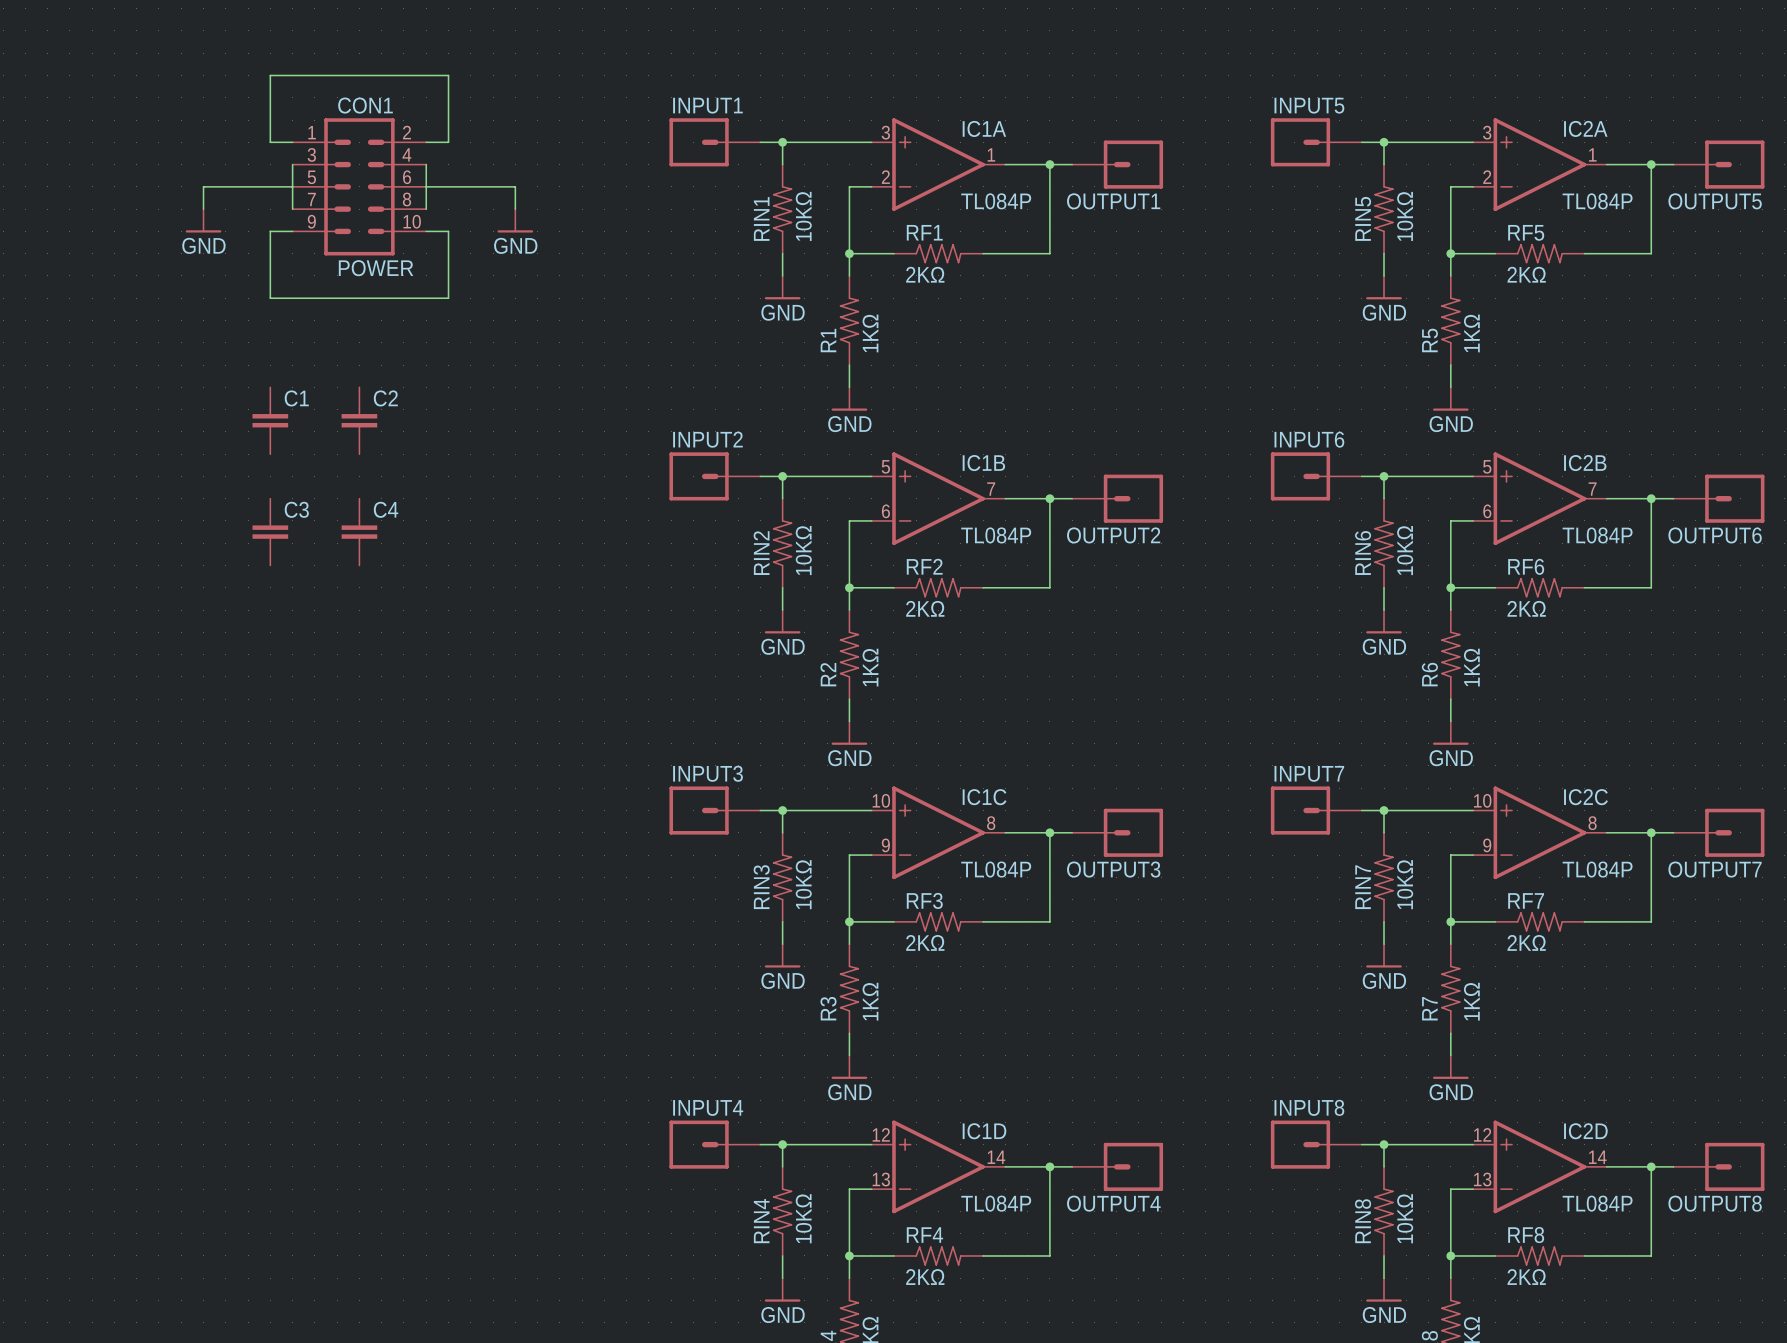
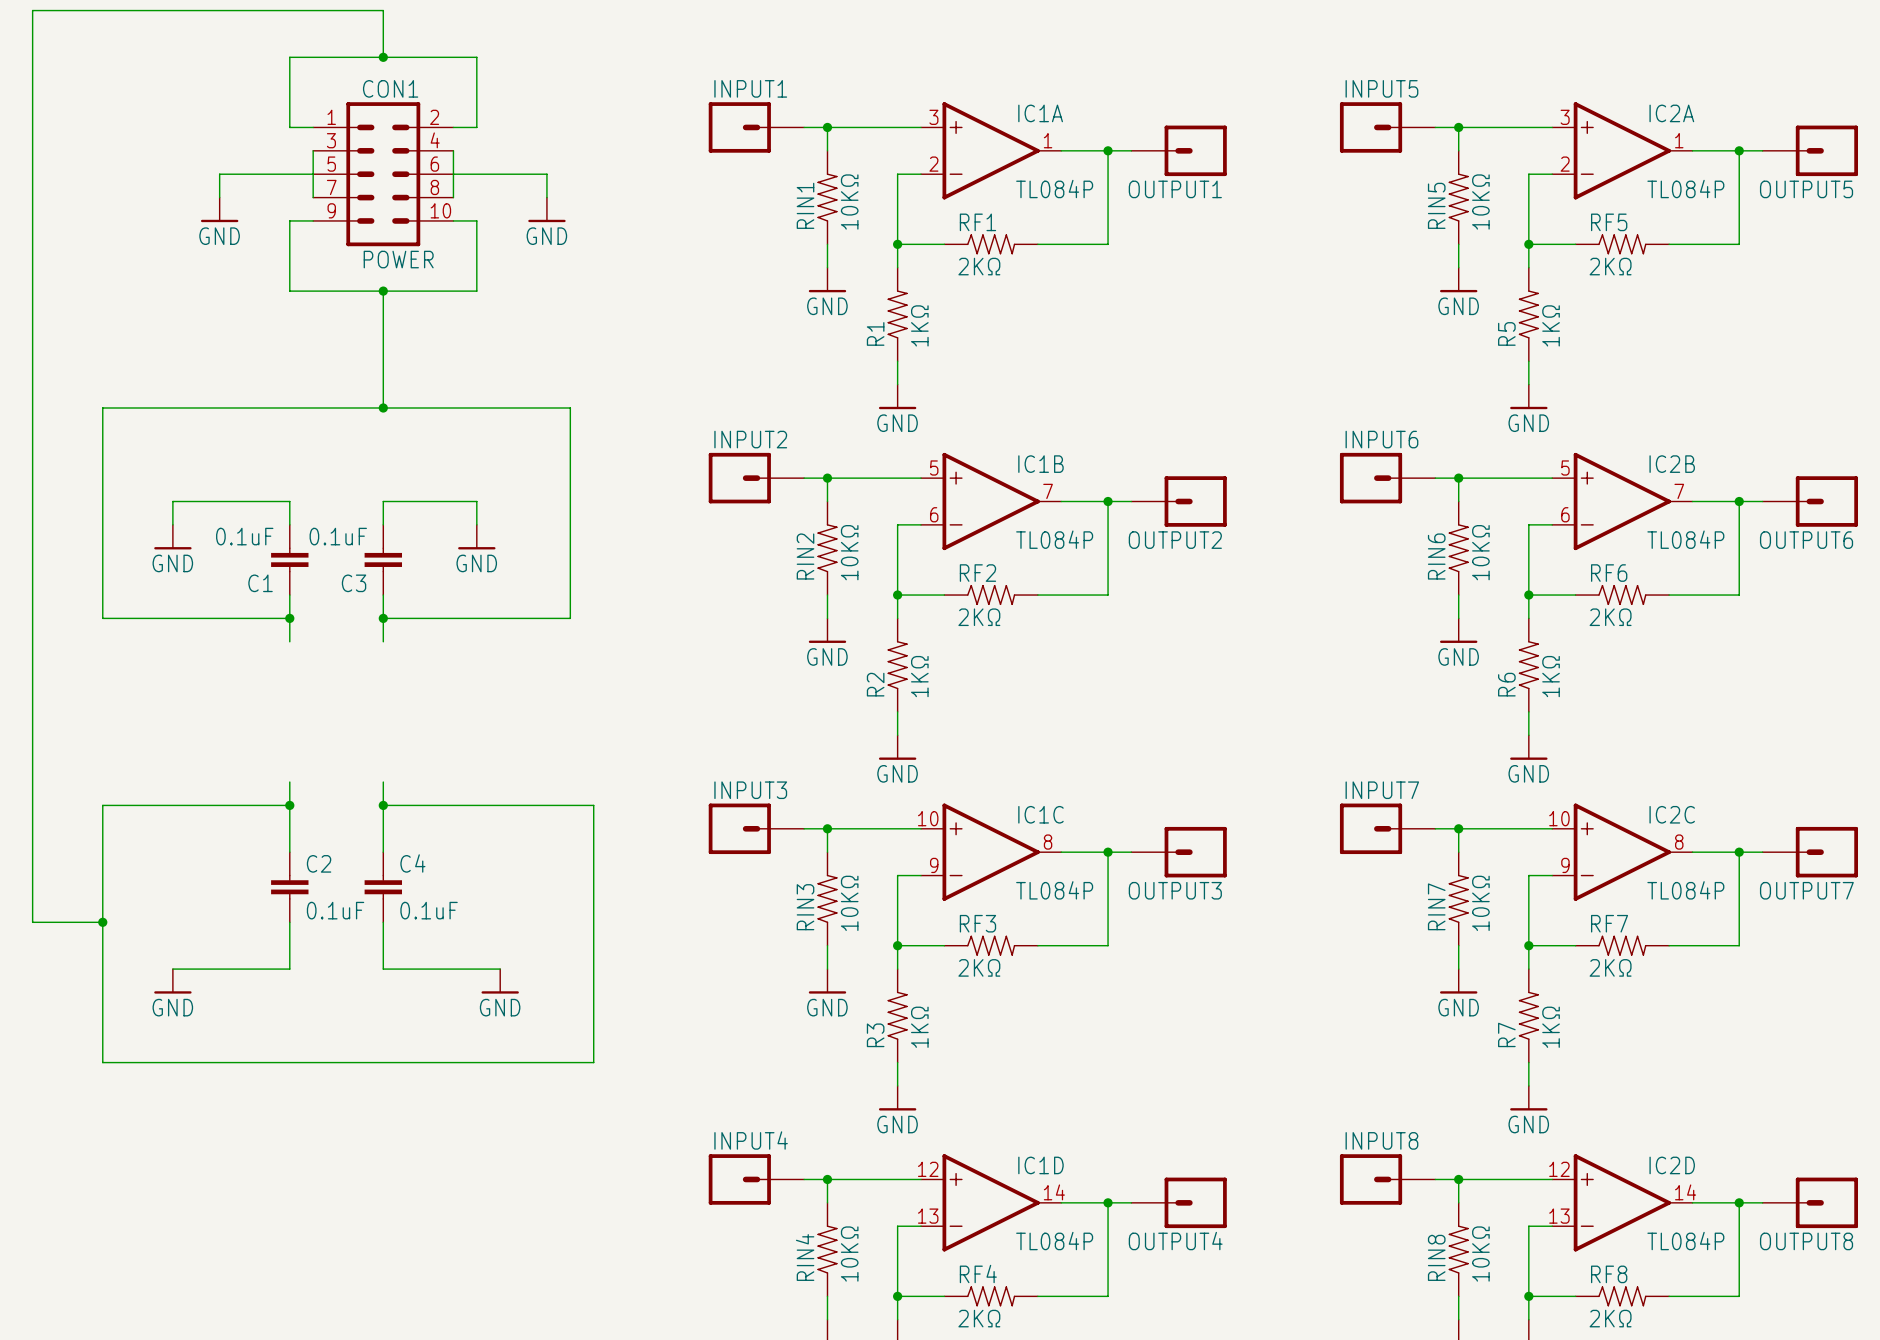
wire: none -> (383, 57) (383, 10) (32, 10) (32, 922) (102, 922)
junction: none -> (383, 57)
wire: none -> (383, 291) (383, 407)
junction: none -> (383, 291)
C1 name position: C1 (296, 398) -> C1 (260, 583)
junction: none -> (383, 407)
C1 position: (270, 420) -> (289, 559)
C2 position: (359, 420) -> (289, 887)
C3 name position: C3 (296, 509) -> C3 (354, 583)
wire: none -> (172, 524) (172, 501) (289, 501) (289, 524)
wire: none -> (383, 524) (383, 501) (476, 501) (476, 524)
power symbol: none -> GND (172, 537)
C1 value: none -> 0.1uF (244, 536)
C3 position: (270, 532) -> (383, 559)
C3 value: none -> 0.1uF (338, 536)
C4 position: (359, 532) -> (383, 887)
power symbol: none -> GND (476, 537)
wire: none -> (289, 595) (289, 641)
wire: none -> (383, 595) (383, 641)
wire: none -> (289, 618) (102, 618) (102, 407) (570, 407) (570, 618) (383, 618)
junction: none -> (289, 618)
junction: none -> (383, 618)
wire: none -> (289, 782) (289, 852)
wire: none -> (383, 782) (383, 852)
wire: none -> (289, 805) (102, 805) (102, 1062) (593, 1062) (593, 805) (383, 805)
junction: none -> (289, 805)
junction: none -> (383, 805)
C2 value: none -> 0.1uF (335, 910)
C4 value: none -> 0.1uF (429, 910)
junction: none -> (102, 922)
wire: none -> (289, 922) (289, 969) (172, 969)
wire: none -> (383, 922) (383, 969) (500, 969)
power symbol: none -> GND (172, 981)
power symbol: none -> GND (500, 981)

